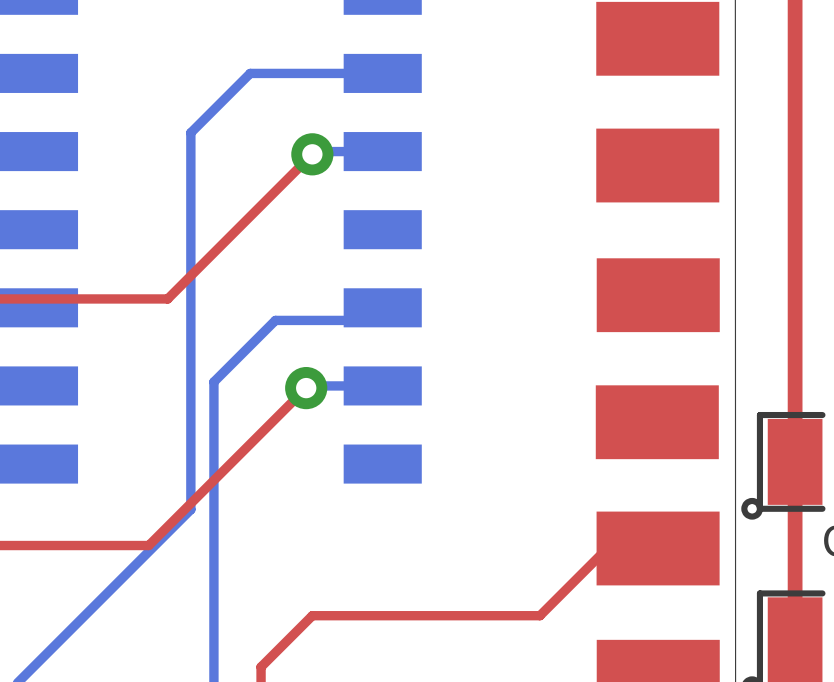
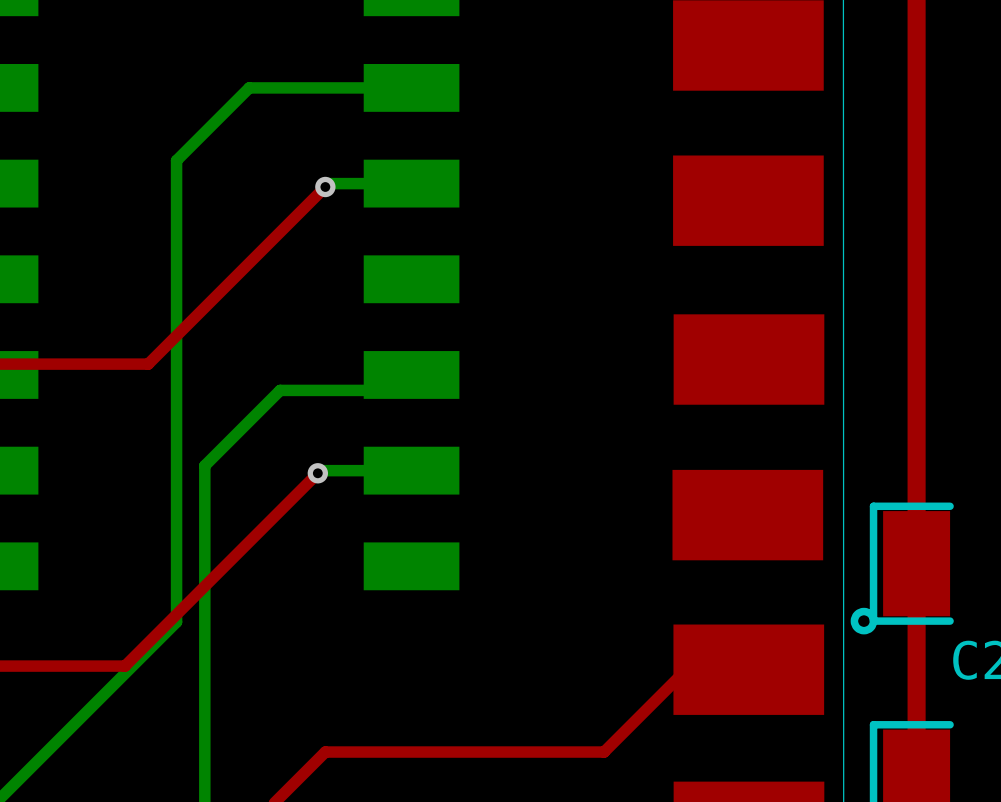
via size: [291, 133, 334, 176] -> [315, 176, 336, 198]
via size: [285, 366, 328, 410] -> [307, 463, 329, 484]

